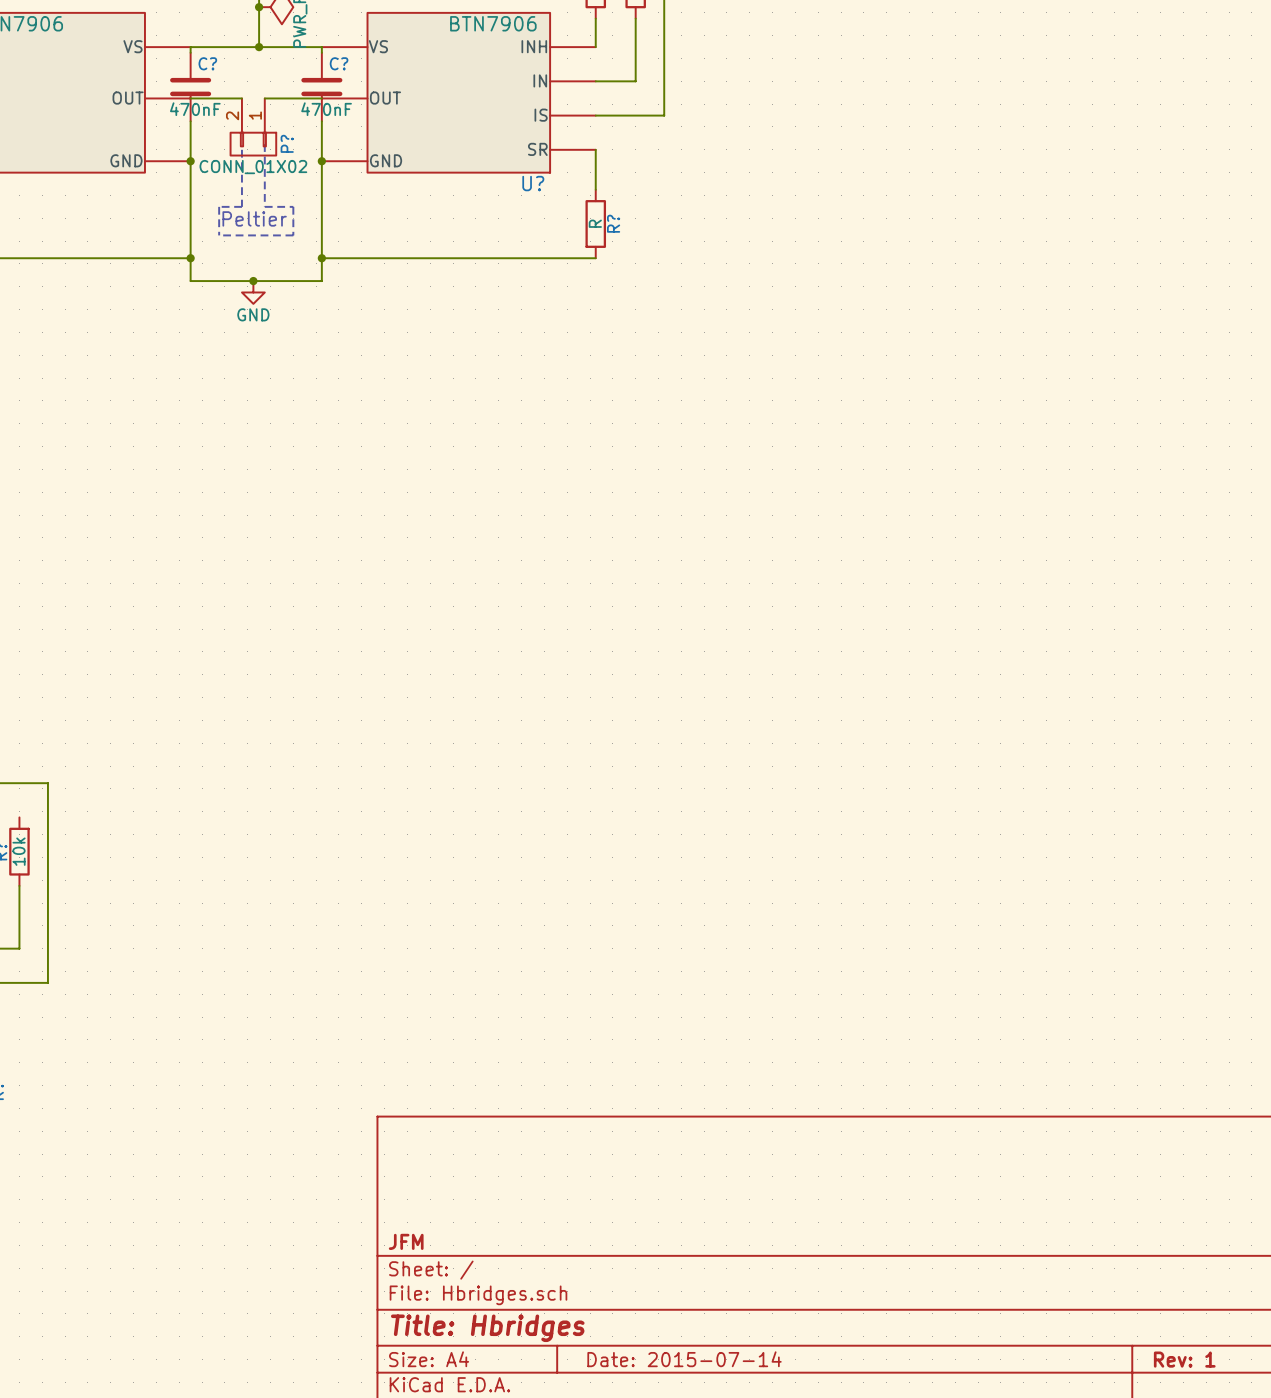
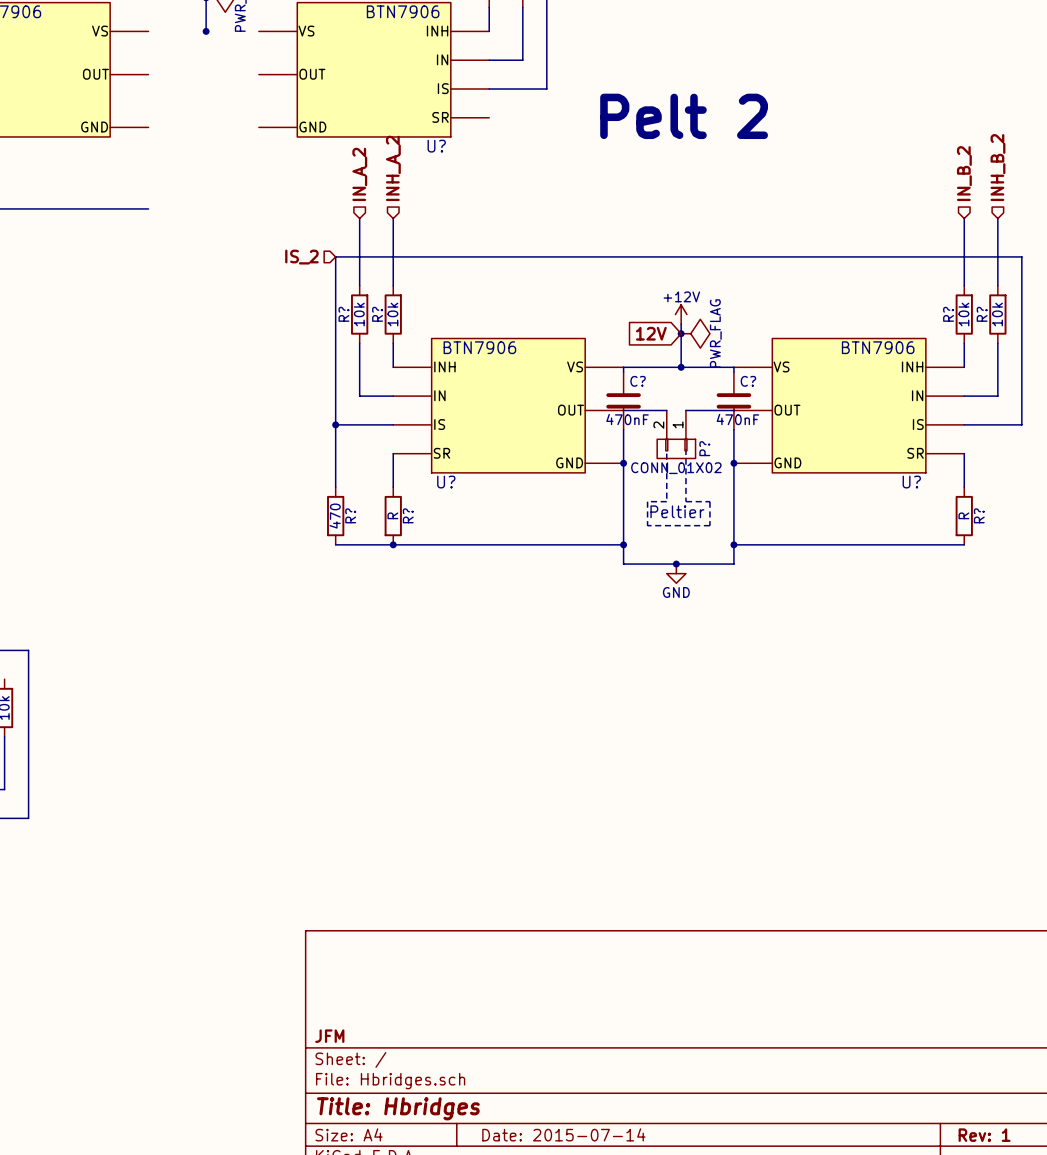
wire: (190, 52) (190, 47) (321, 47) (321, 52) -> none
C?: 470nF (190, 87) -> none
C?: 470nF (321, 87) -> none
wire: (190, 98) (241, 98) -> none
wire: (264, 98) (321, 98) -> none
wire: (190, 121) (190, 281) (321, 281) (321, 121) -> none
P?: CONN_01X02 (253, 126) -> none
line: (264, 144) (264, 206) (293, 206) (293, 235) (219, 235) (219, 206) (241, 206) (241, 149) -> none
text: none -> Pelt 2 (684, 116)
wire: (595, 149) (595, 189) -> none
junction: (190, 161) -> none
junction: (321, 161) -> none
hierarchical label: none -> INH_B_2 (997, 167)
hierarchical label: none -> INH_A_2 (393, 168)
hierarchical label: none -> IN_B_2 (964, 173)
hierarchical label: none -> IN_A_2 (359, 174)
text: Peltier (254, 218) -> none
R?: R (595, 223) -> none
junction: (190, 258) -> none
wire: (321, 258) (595, 258) -> none
junction: (321, 258) -> none
wire: none -> (359, 218) (359, 285)
wire: none -> (393, 218) (393, 285)
wire: none -> (964, 218) (964, 285)
wire: none -> (997, 218) (997, 285)
junction: (253, 281) -> none
power symbol: GND (253, 292) -> none
hierarchical label: none -> IS_2 (301, 257)
R?: none -> 10k (359, 314)
R?: none -> 10k (393, 314)
power symbol: none -> +12V (681, 314)
R?: none -> 10k (964, 314)
R?: none -> 10k (997, 314)
wire: none -> (681, 324) (681, 367)
global label: none -> 12V (651, 333)
junction: none -> (681, 333)
power symbol: none -> PWR_FLAG (695, 333)
wire: none -> (359, 343) (359, 396) (393, 396)
wire: none -> (393, 343) (393, 367)
wire: none -> (964, 343) (964, 367)
wire: none -> (997, 343) (997, 396) (964, 396)
junction: none -> (681, 367)
wire: none -> (623, 372) (623, 367) (733, 367) (733, 372)
C?: none -> 470nF (623, 400)
C?: none -> 470nF (733, 400)
U?: none -> BTN7906 (508, 405)
U?: none -> BTN7906 (849, 405)
wire: none -> (623, 410) (666, 410)
wire: none -> (685, 410) (733, 410)
wire: none -> (335, 424) (393, 424)
junction: none -> (335, 424)
wire: none -> (964, 424) (1021, 424) (1021, 256) (335, 256) (335, 487)
wire: none -> (623, 429) (623, 564) (733, 564) (733, 429)
P?: none -> CONN_01X02 (676, 434)
line: none -> (685, 448) (685, 501) (709, 501) (709, 525) (647, 525) (647, 501) (666, 501) (666, 453)
wire: none -> (393, 453) (393, 487)
wire: none -> (964, 453) (964, 487)
junction: none -> (623, 463)
junction: none -> (733, 463)
text: none -> Peltier (677, 511)
R?: none -> 470 (335, 516)
R?: none -> R (393, 516)
R?: none -> R (964, 516)
wire: none -> (335, 544) (623, 544)
junction: none -> (393, 544)
junction: none -> (623, 544)
wire: none -> (733, 544) (964, 544)
junction: none -> (733, 544)
junction: none -> (676, 564)
power symbol: none -> GND (676, 573)

